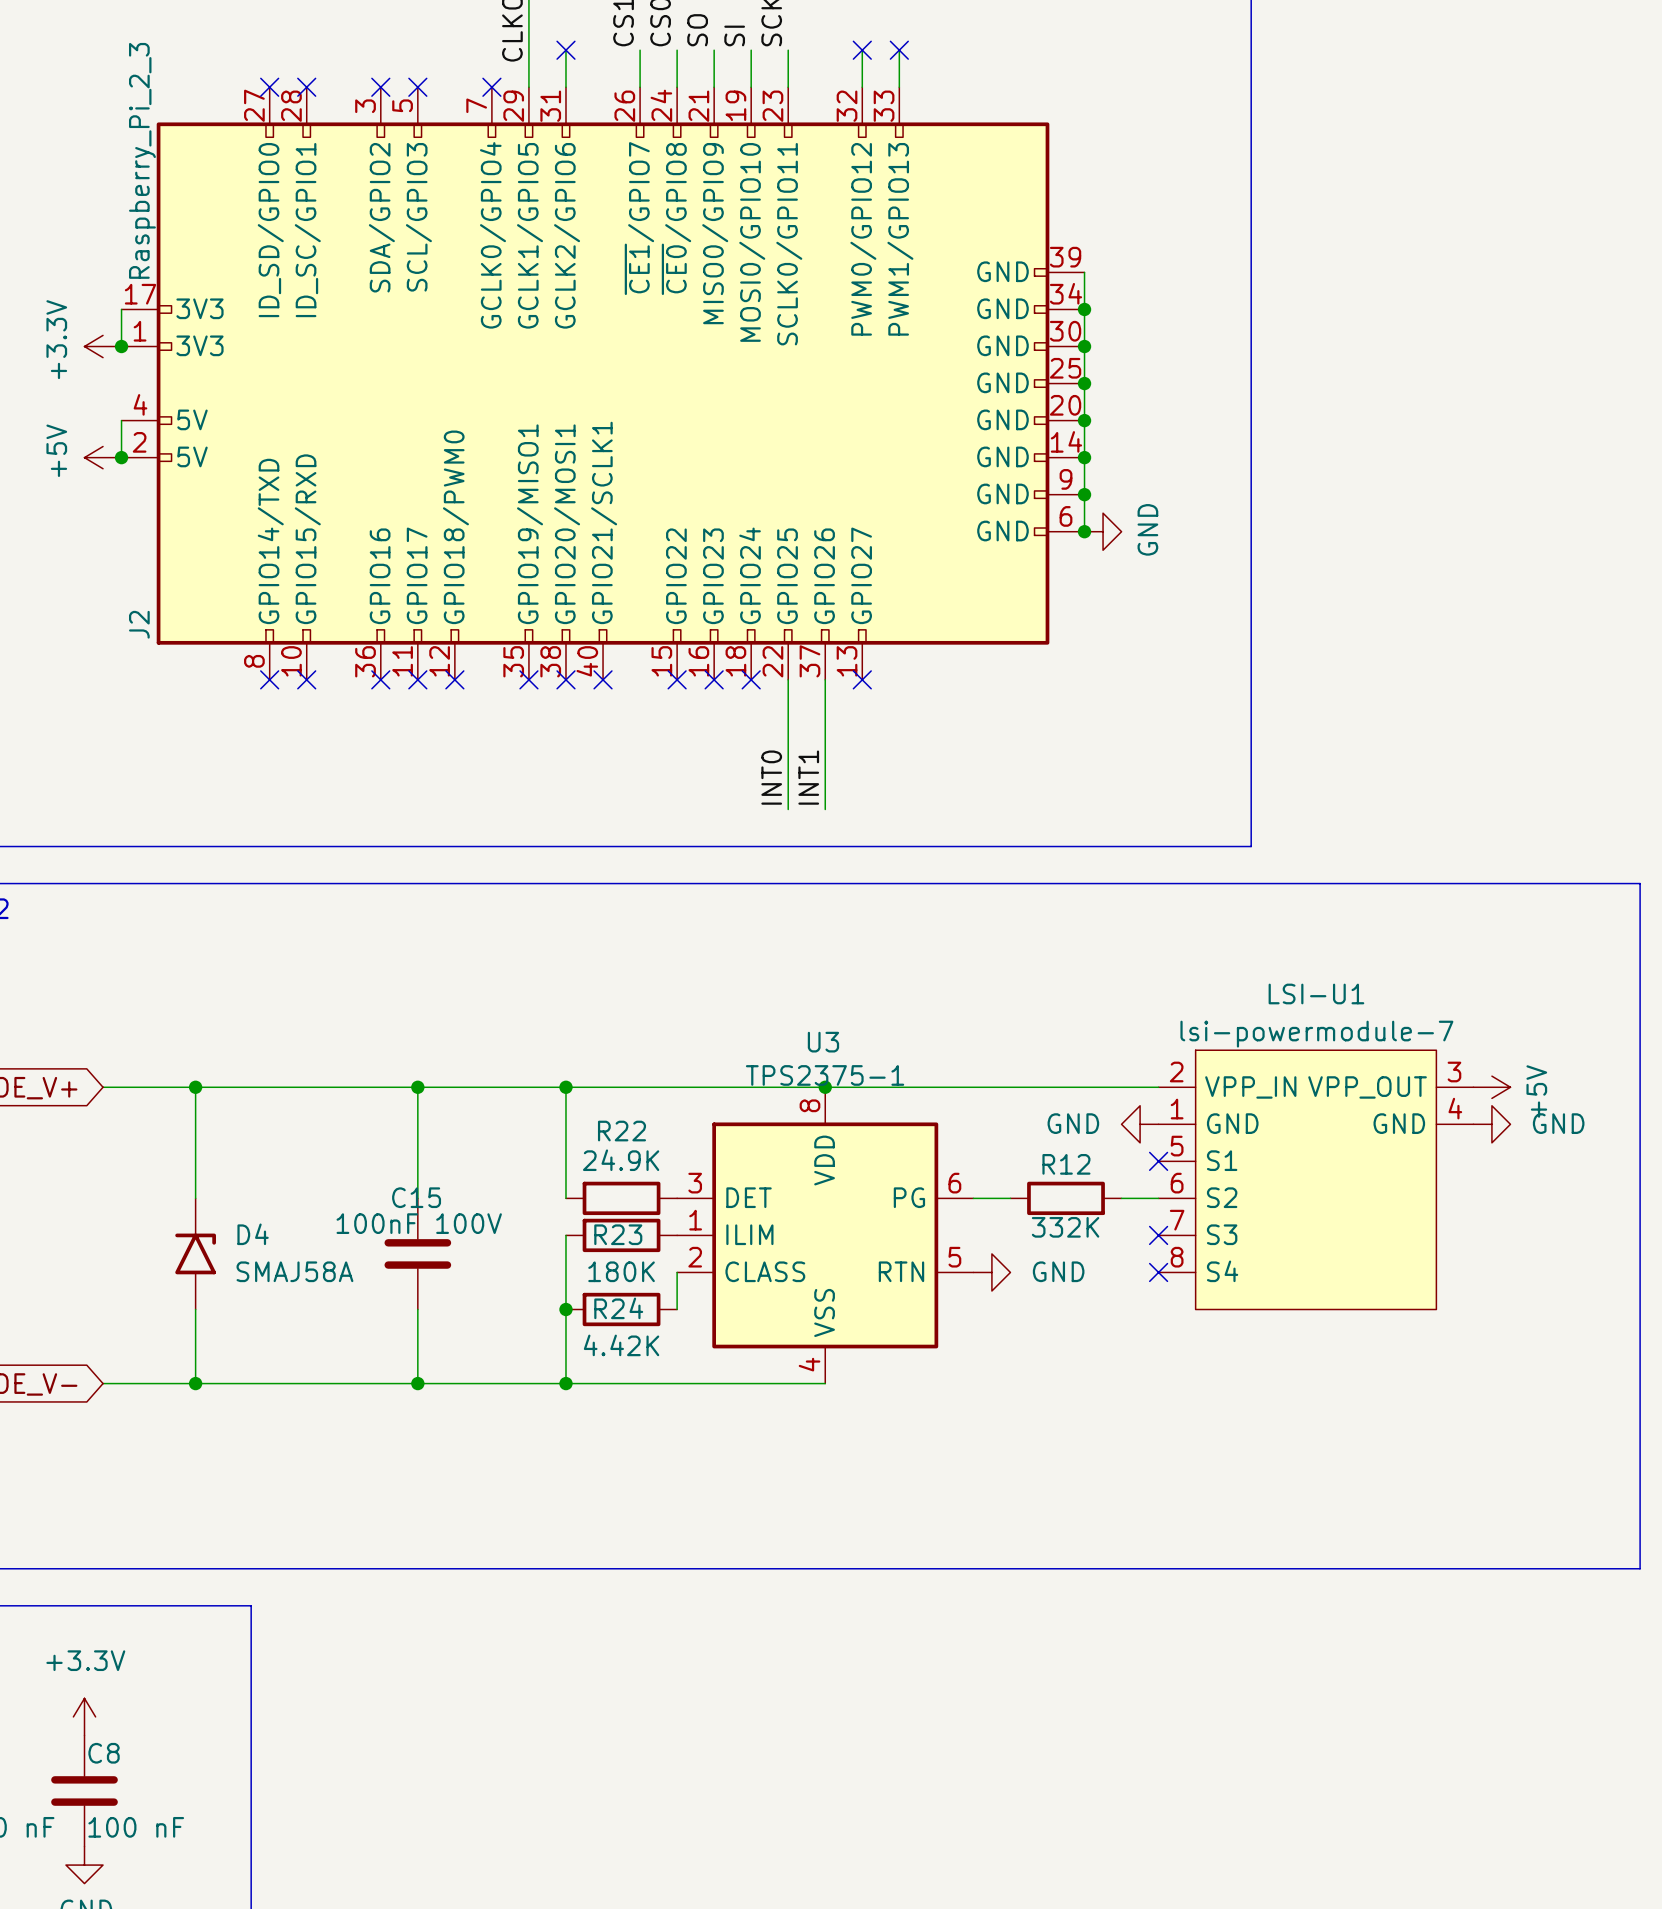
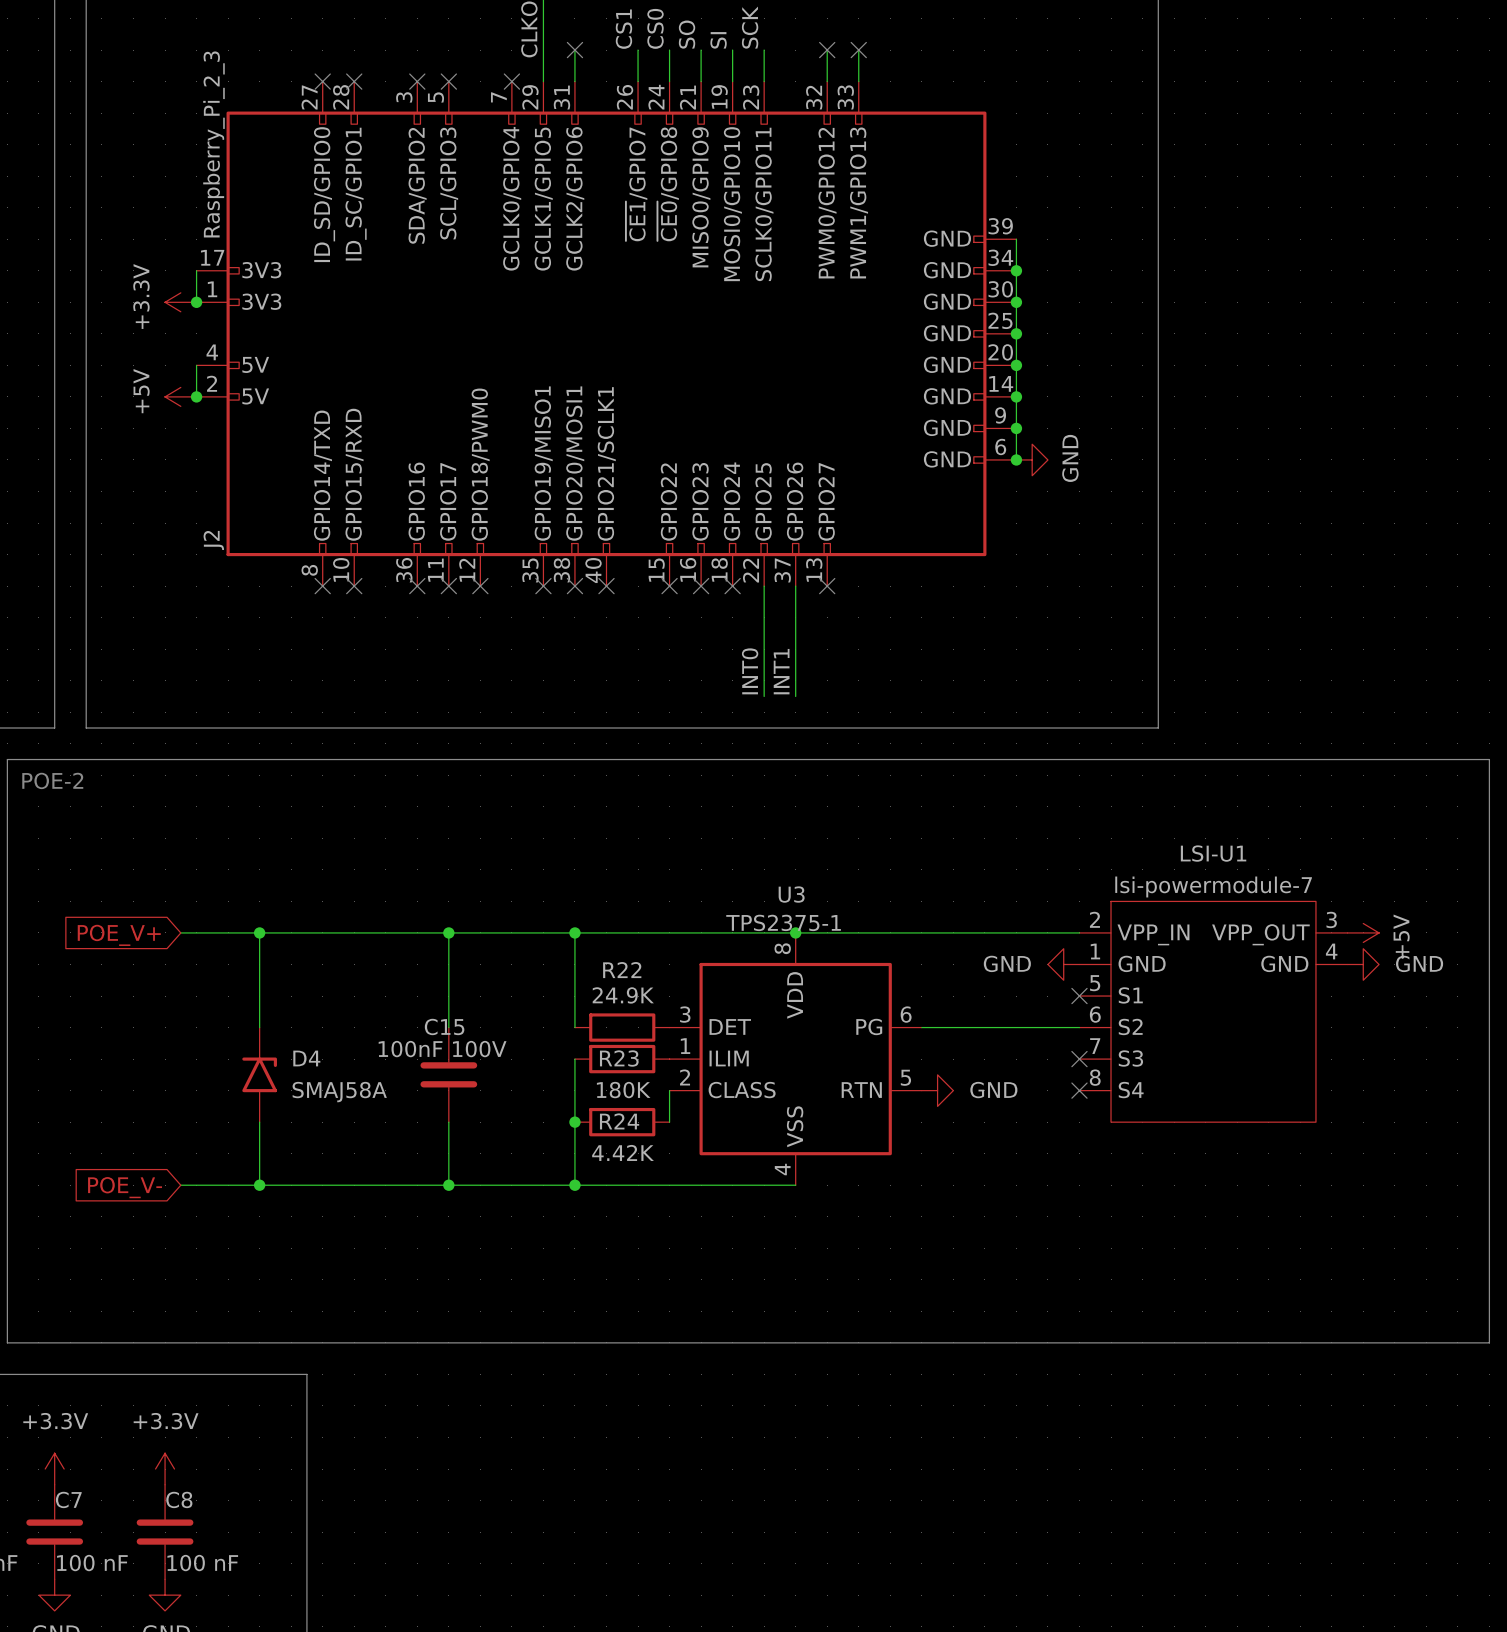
wire: none -> (953, 1027) (1047, 1027)
R12: 332K (1066, 1198) -> none

